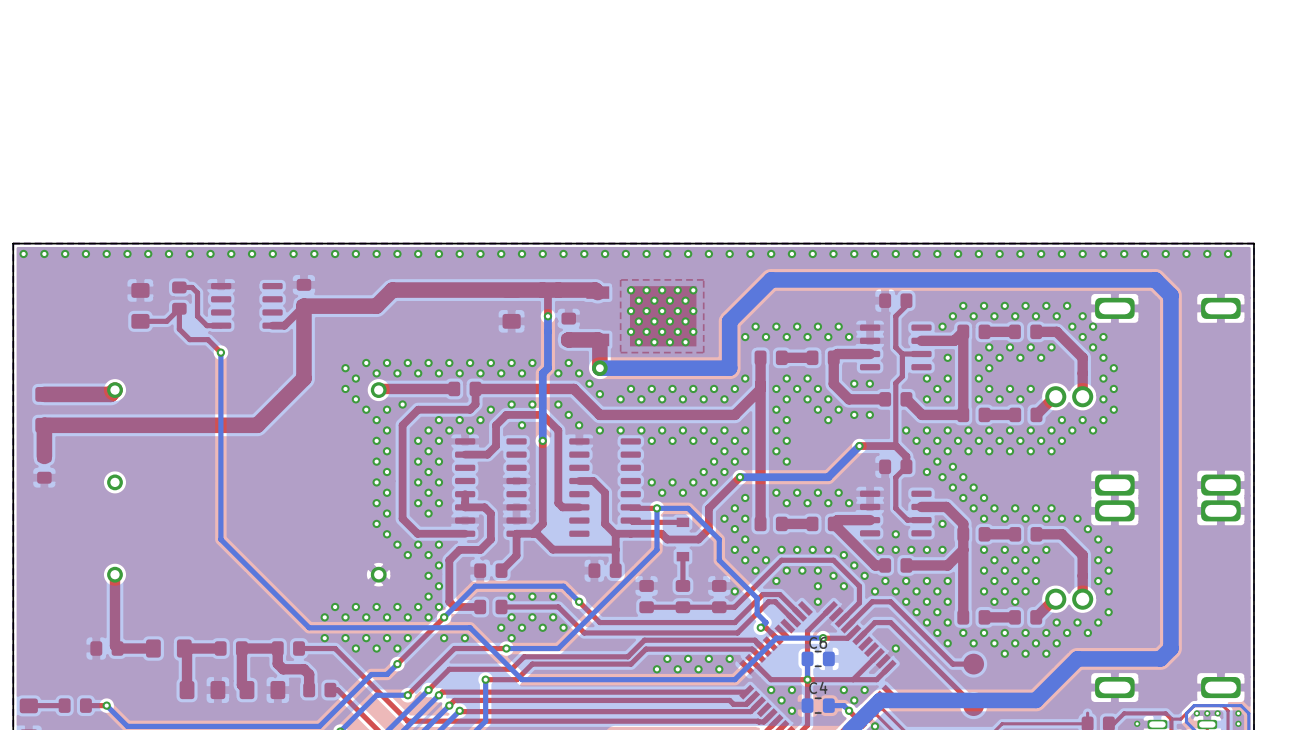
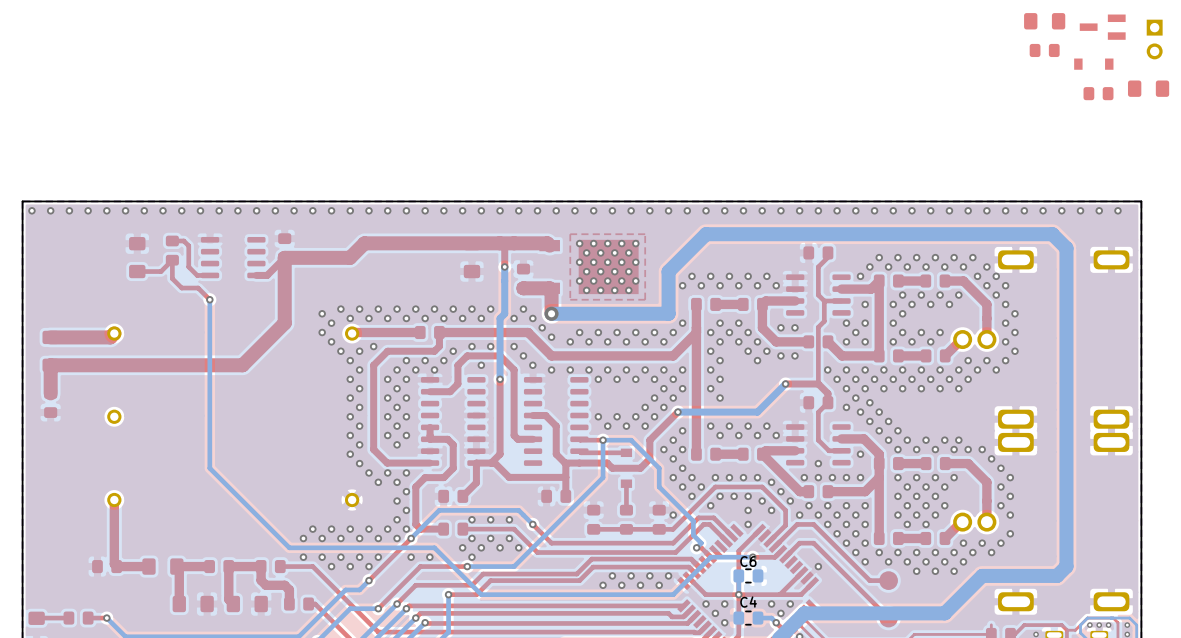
part: none -> (1044, 21)
part: none -> (1102, 27)
part: none -> (1154, 39)
part: none -> (1044, 50)
part: none -> (1093, 64)
part: none -> (1148, 88)
part: none -> (1098, 93)

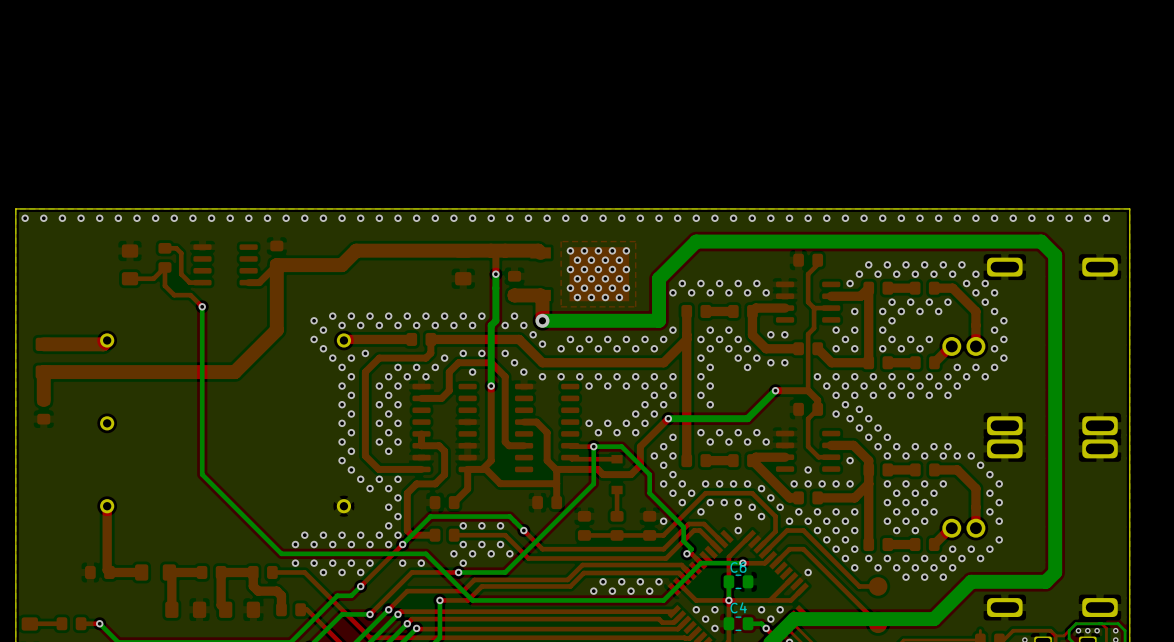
part: (1044, 21) -> none
part: (1102, 27) -> none
part: (1154, 39) -> none
part: (1044, 50) -> none
part: (1093, 64) -> none
part: (1148, 88) -> none
part: (1098, 93) -> none

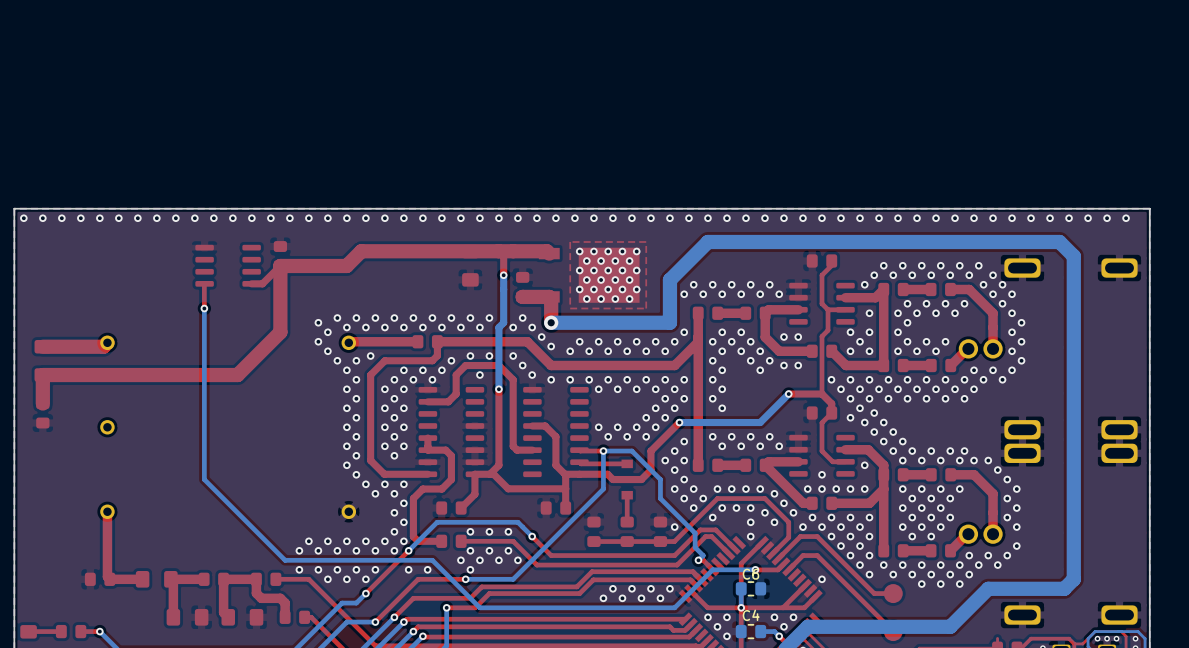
top track: (164, 248) (176, 248) (181, 253) (181, 274) (189, 282) (202, 282) -> (204, 308) (204, 284)
part: (164, 257) -> none
part: (130, 264) -> none
top track: (130, 278) (153, 278) (164, 267) (164, 285) (174, 295) (190, 295) (202, 306) -> none

